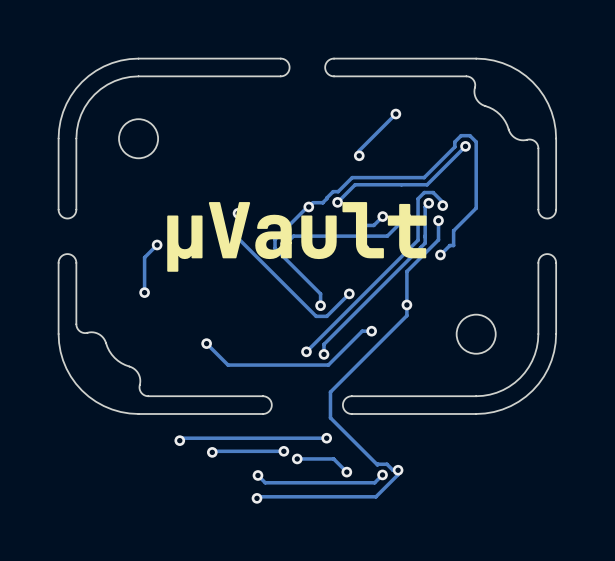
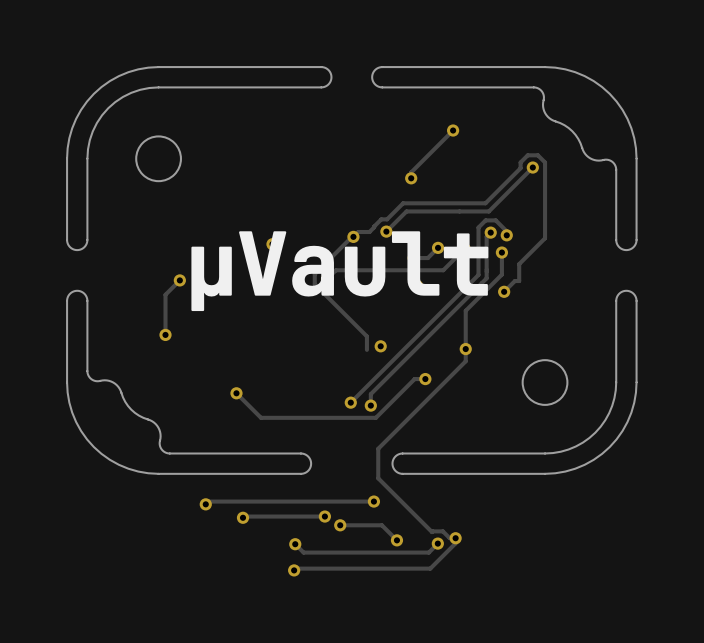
track: (238, 213) (238, 238) (316, 316) (326, 316) (349, 293) -> none
via: (349, 293) -> none
via: none -> (380, 346)
via: (320, 305) -> none

